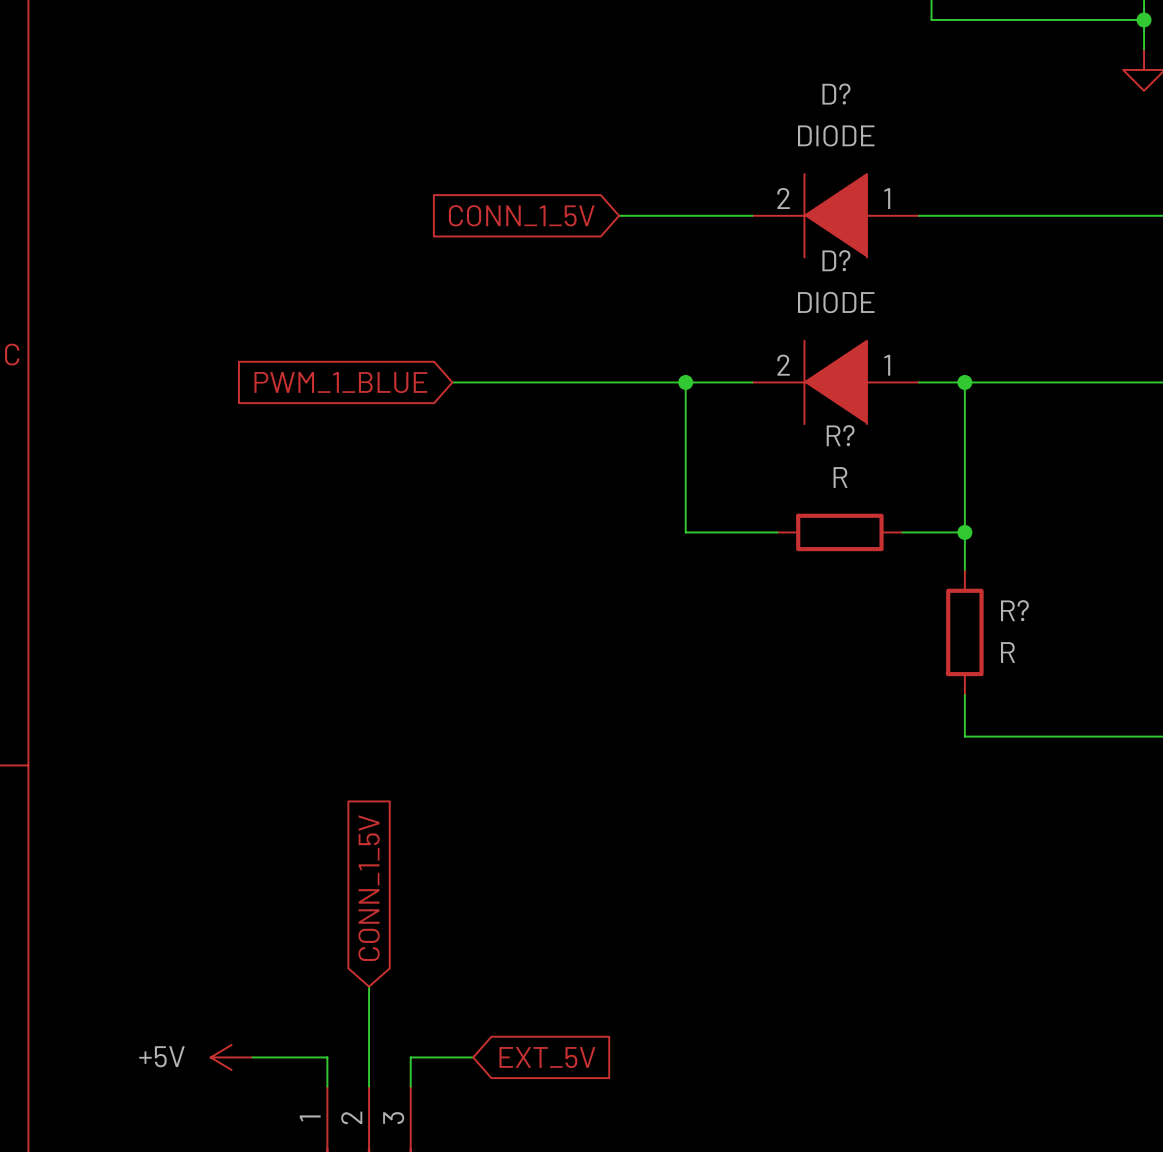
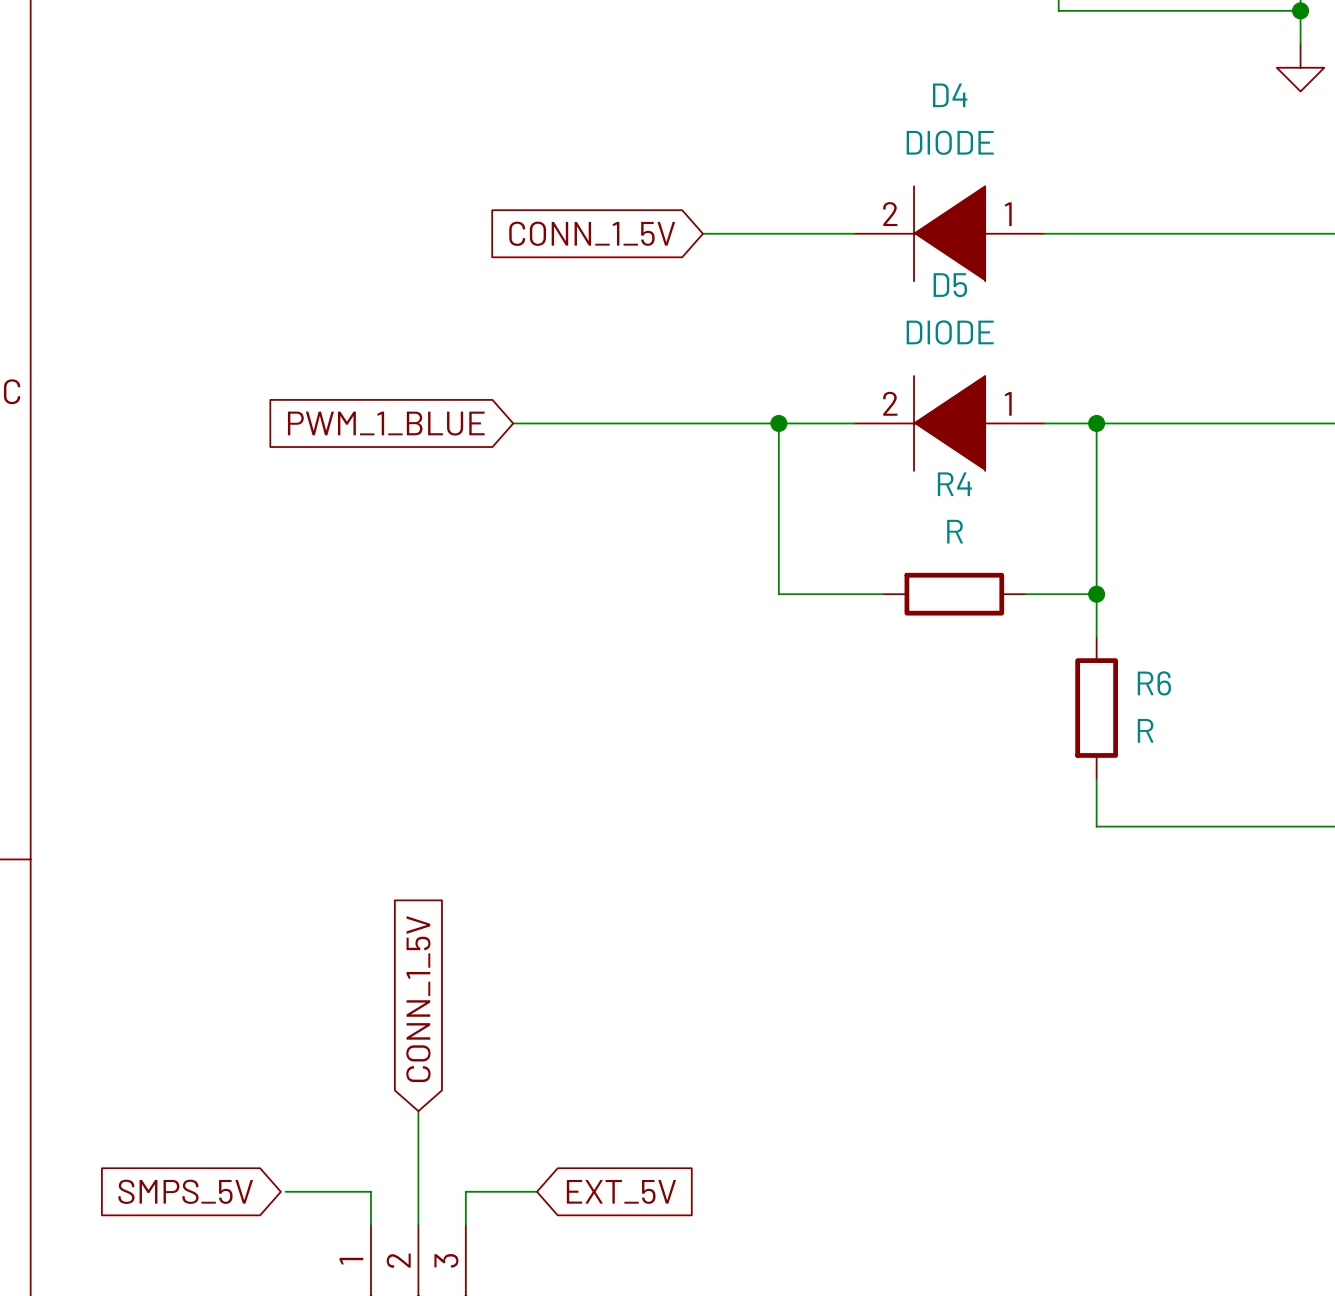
D? name: D? (836, 94) -> D4 (950, 95)
D? name: D? (836, 260) -> D5 (950, 285)
R? name: R? (840, 435) -> R4 (954, 484)
R? name: R? (1014, 610) -> R6 (1154, 683)
global label: none -> SMPS_5V (185, 1191)
power symbol: +5V (231, 1057) -> none

